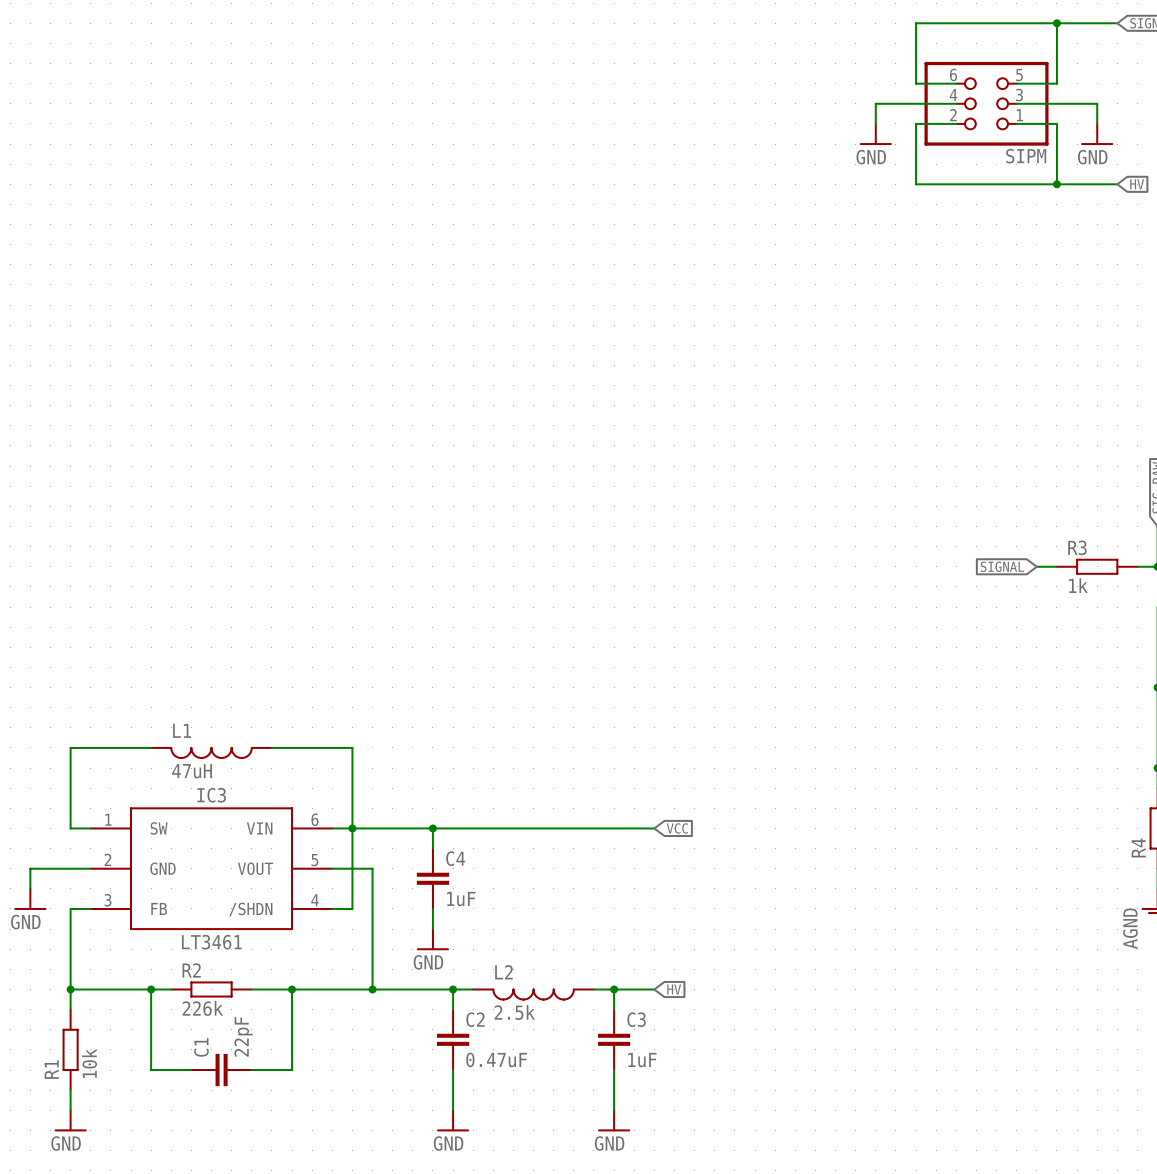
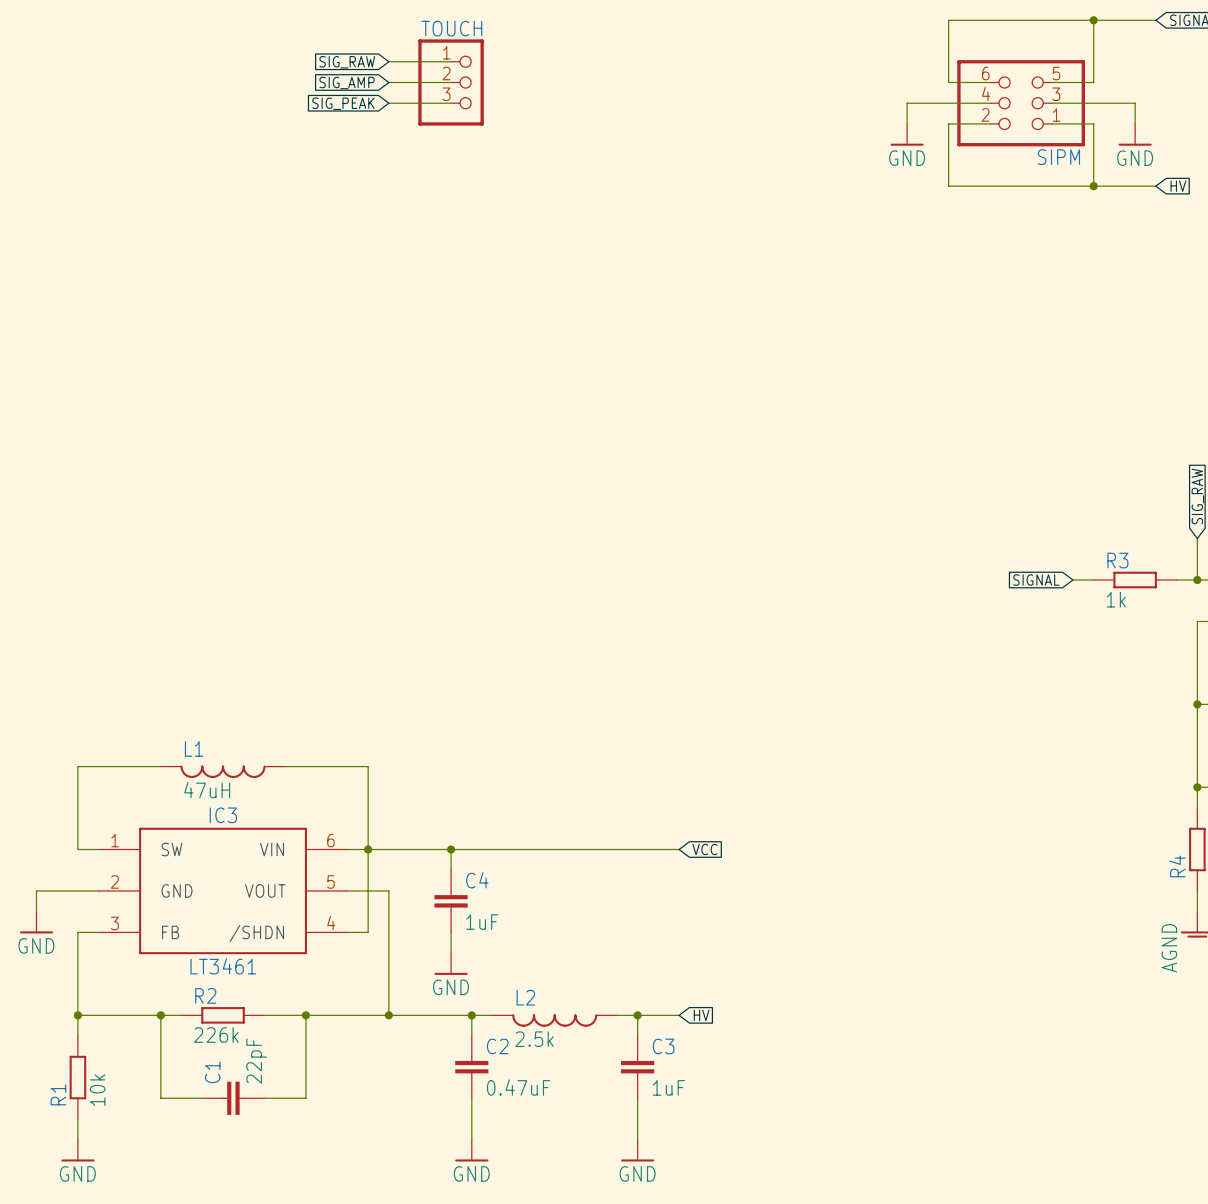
wire: none -> (388, 61) (451, 61)
global label: none -> SIG_RAW (347, 62)
wire: none -> (388, 82) (451, 82)
TOUCH: none -> (451, 82)
global label: none -> SIG_AMP (347, 82)
wire: none -> (388, 103) (451, 103)
global label: none -> SIG_PEAK (343, 103)

